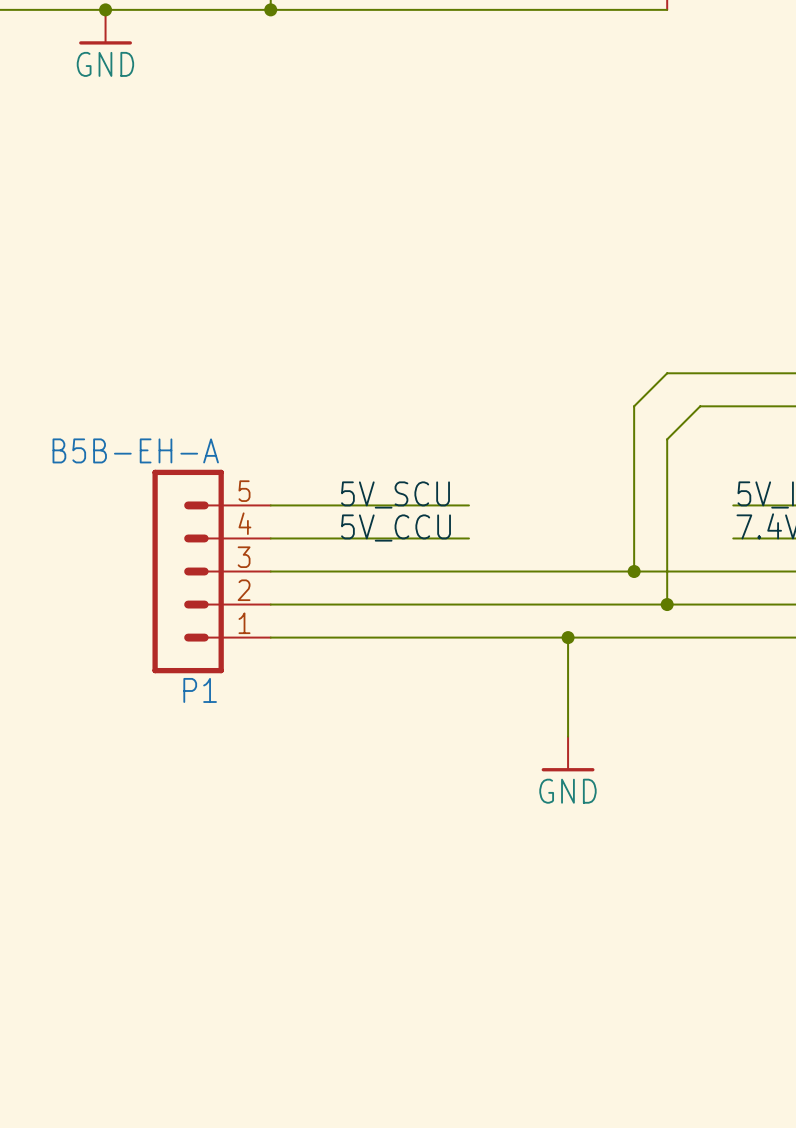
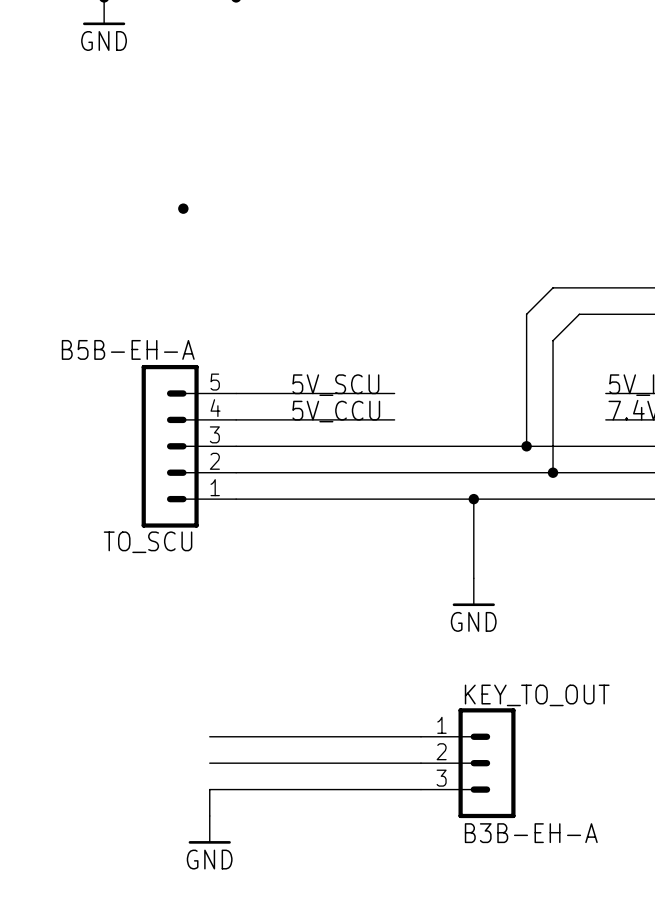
junction: none -> (183, 208)
P1 name: P1 (200, 690) -> TO_SCU (148, 542)
wire: none -> (209, 736) (420, 736)
wire: none -> (209, 763) (420, 763)
KEY_TO_OUT: none -> B3B-EH-A (468, 763)
wire: none -> (420, 789) (209, 789) (209, 815)
power symbol: none -> GND (209, 829)

